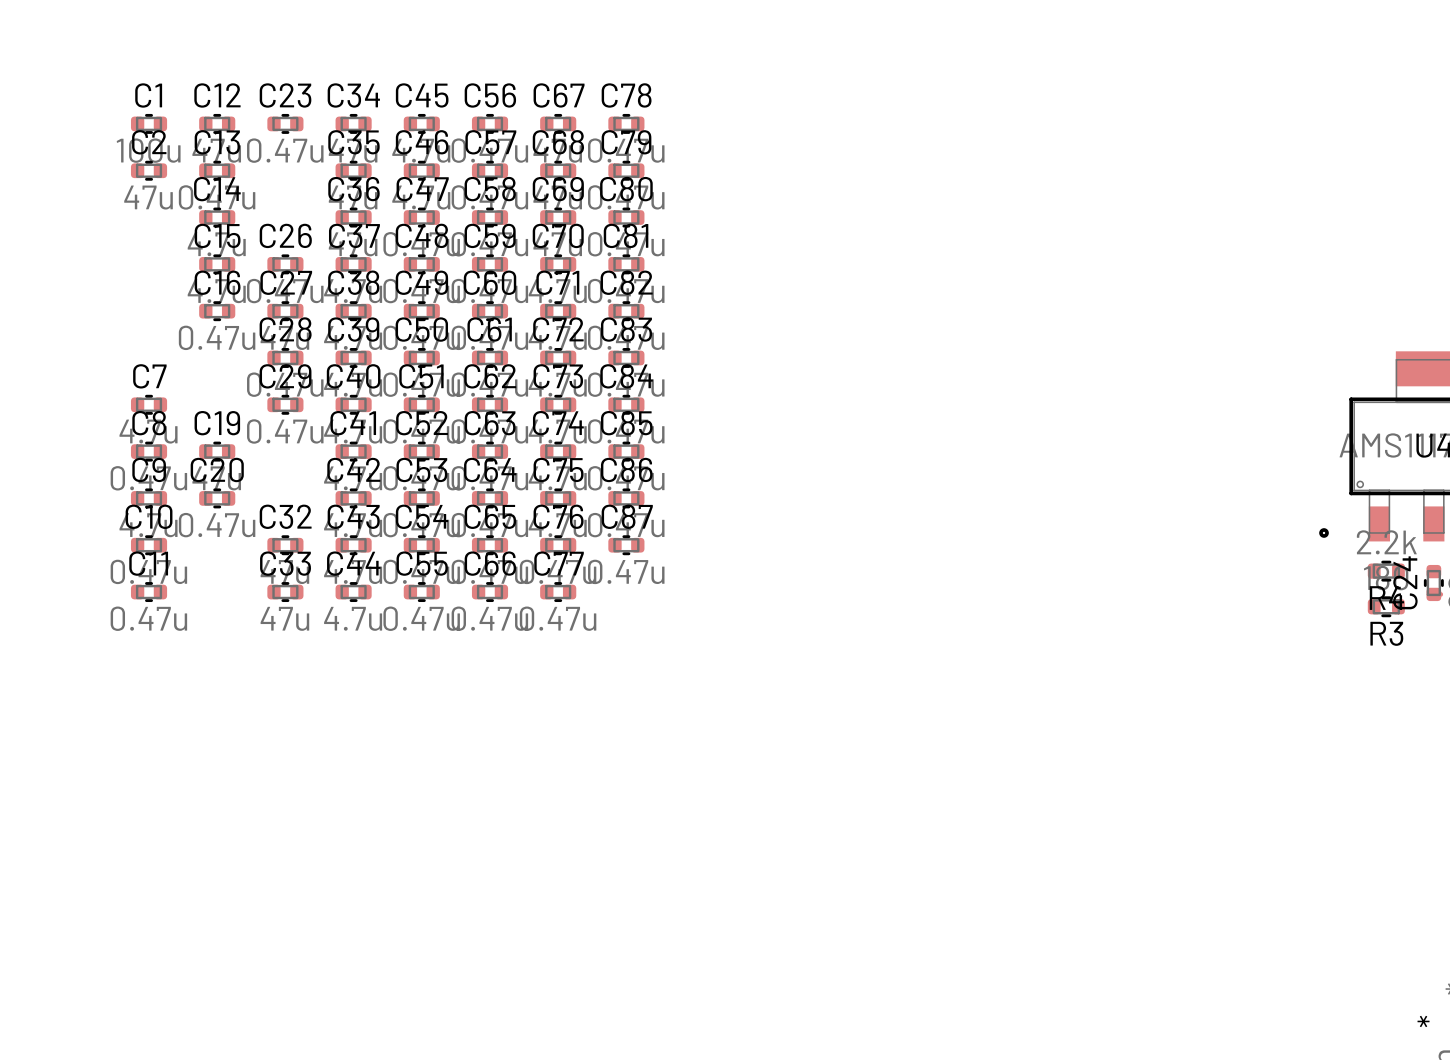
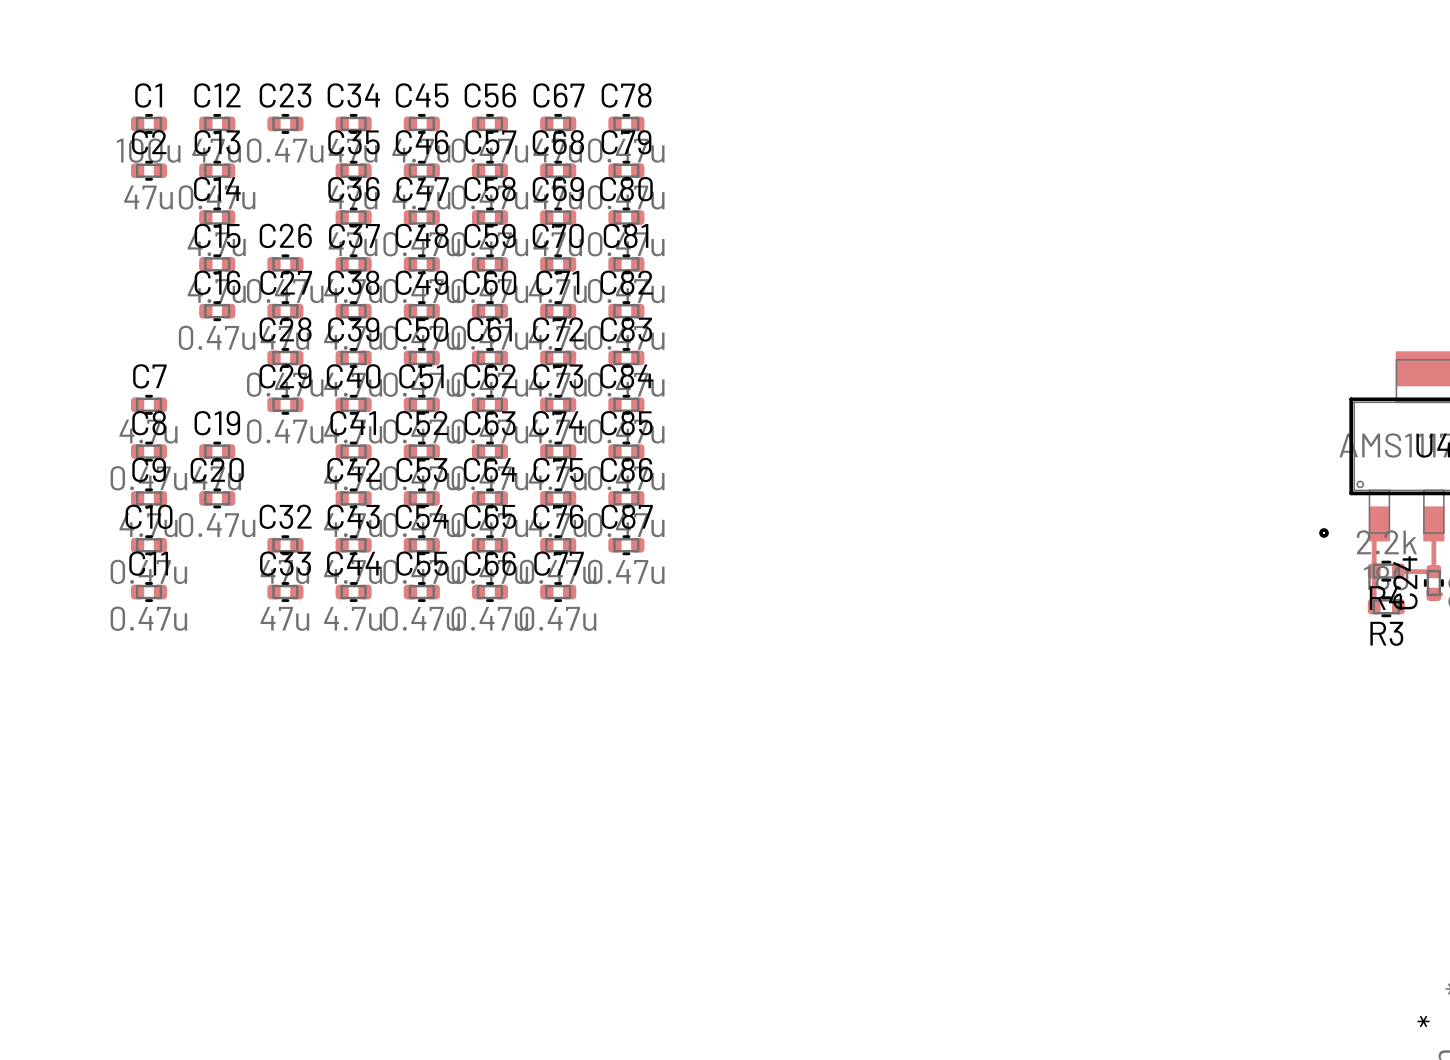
track: none -> (1433, 523) (1433, 571) (1398, 571)
track: none -> (1374, 529) (1374, 606)

